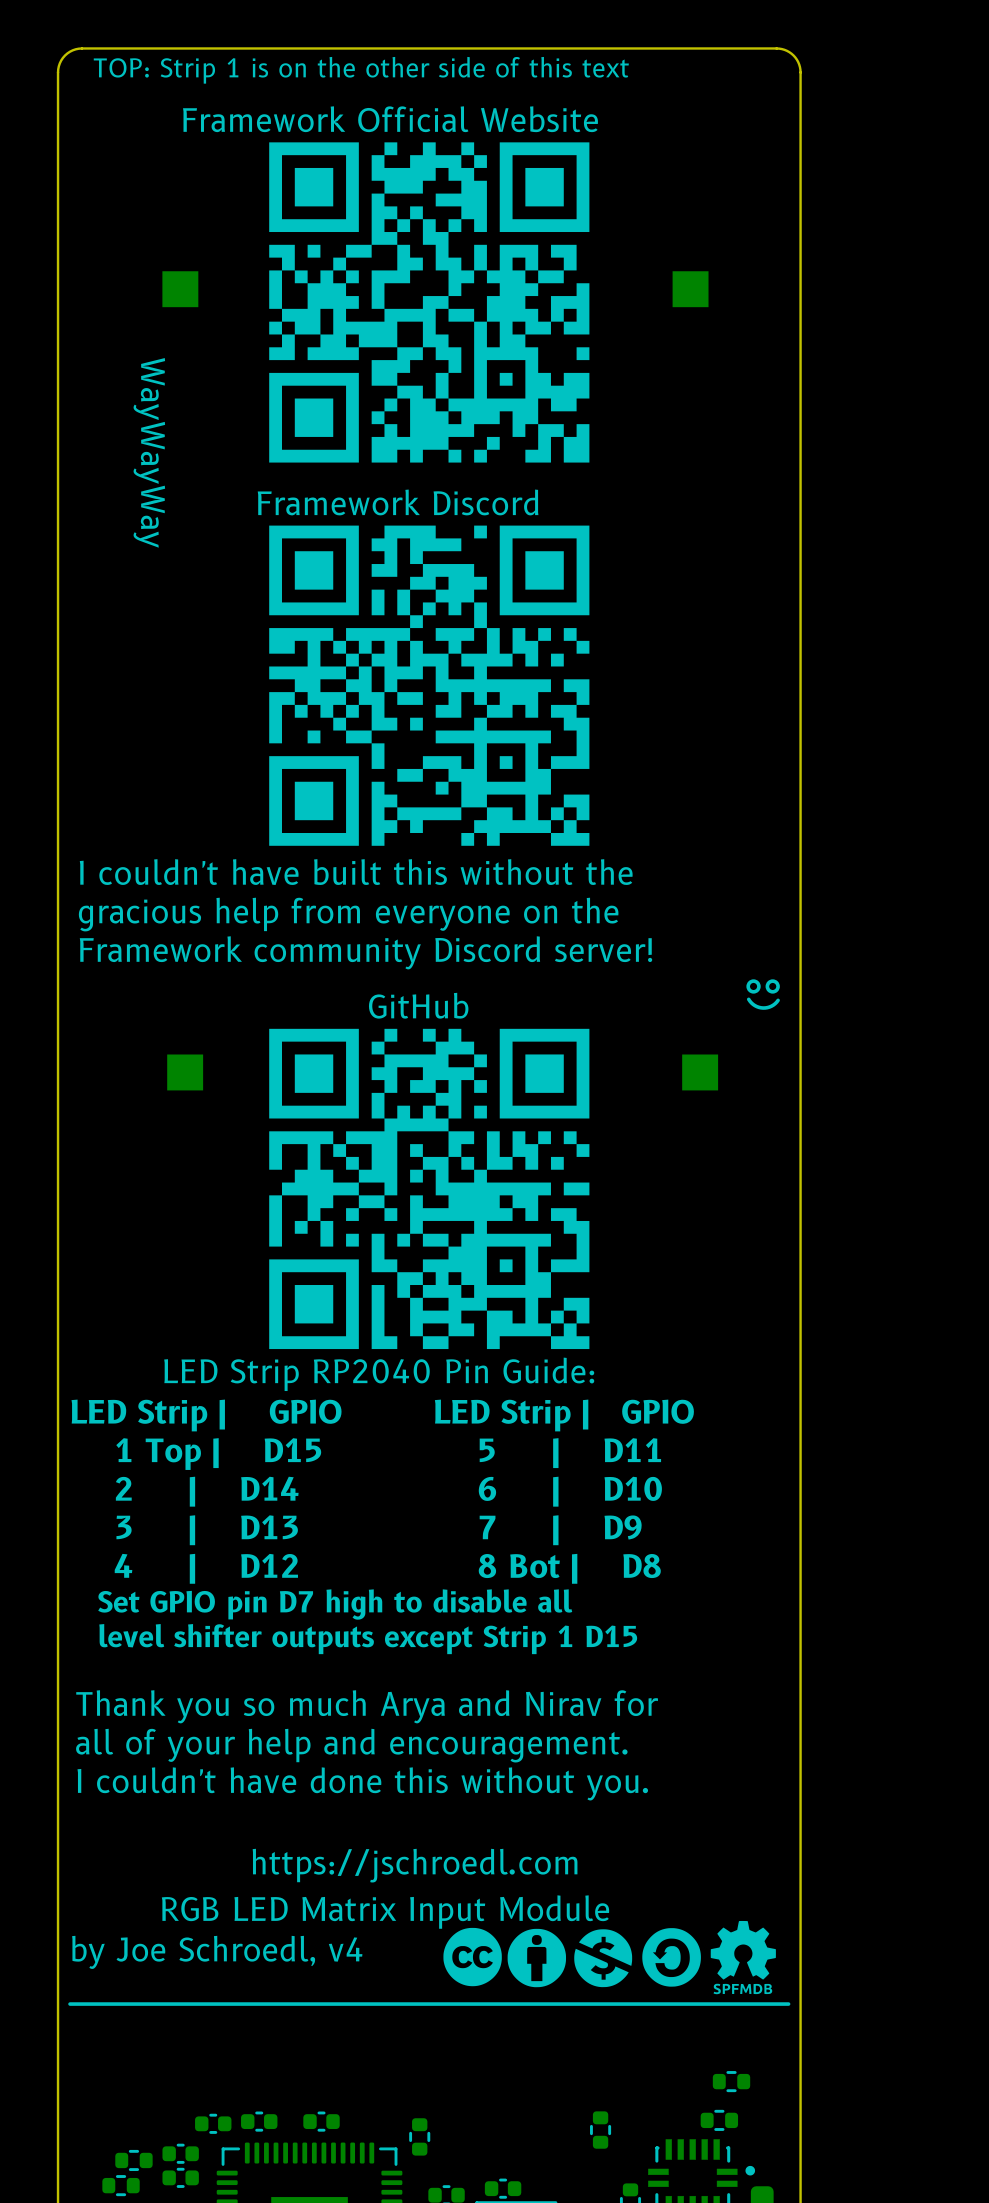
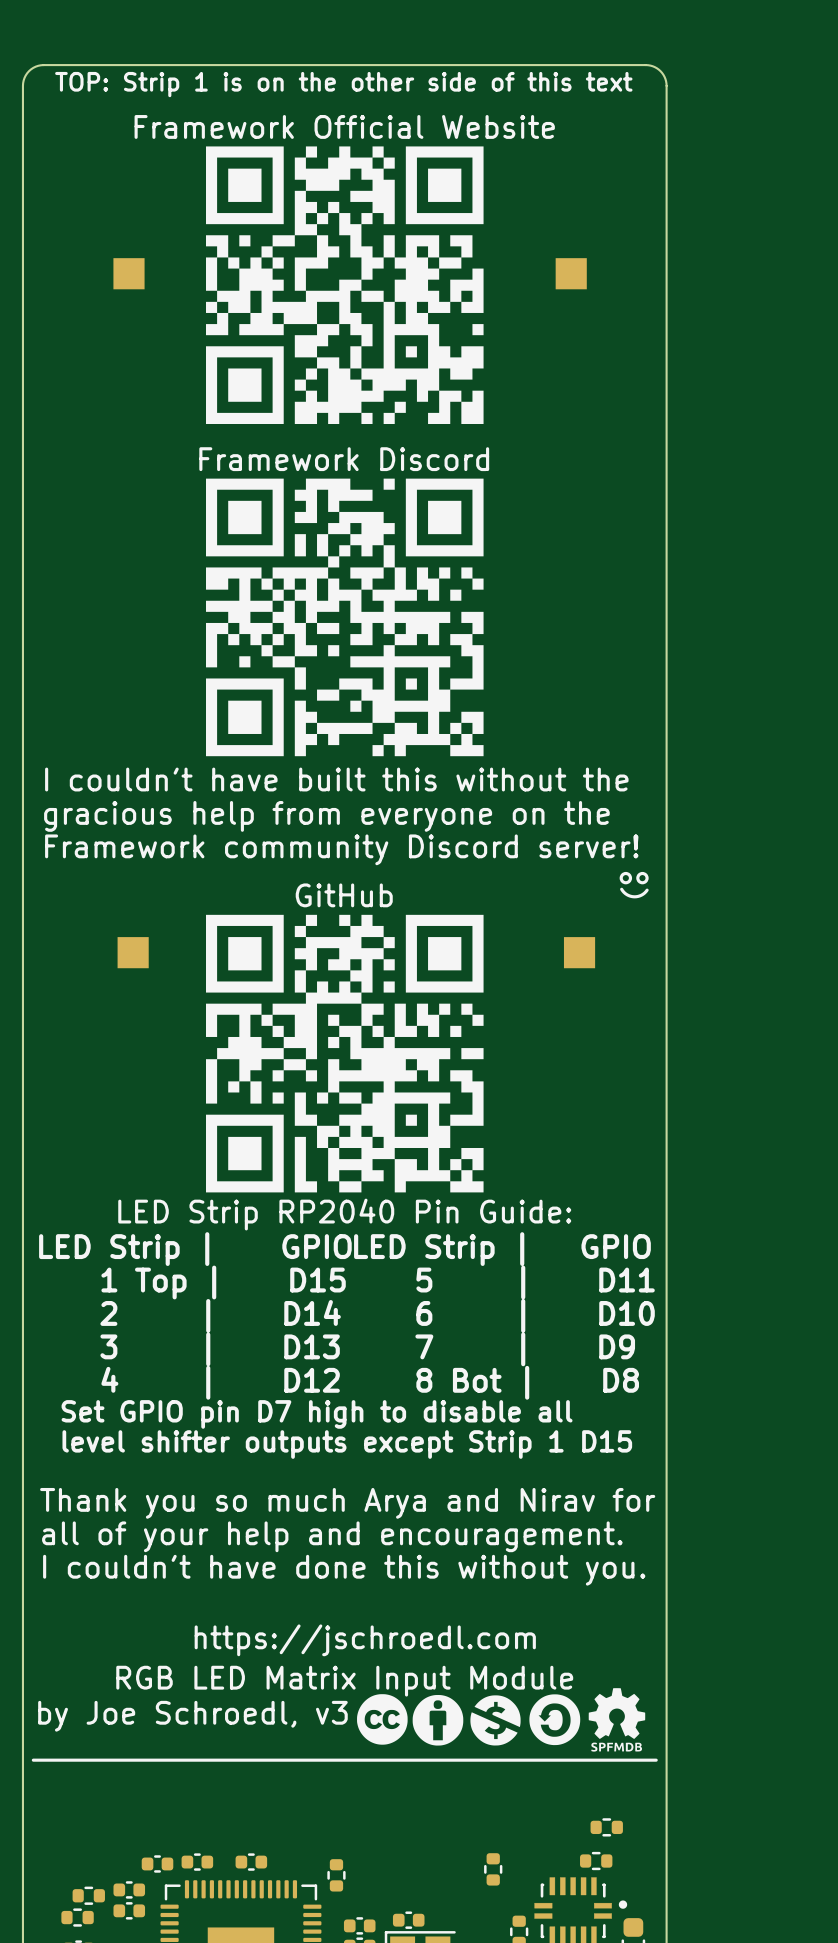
text: WayWayWay (149, 452) -> none
text: by Joe Schroedl, v4 (217, 1952) -> by Joe Schroedl, v3 (192, 1716)

